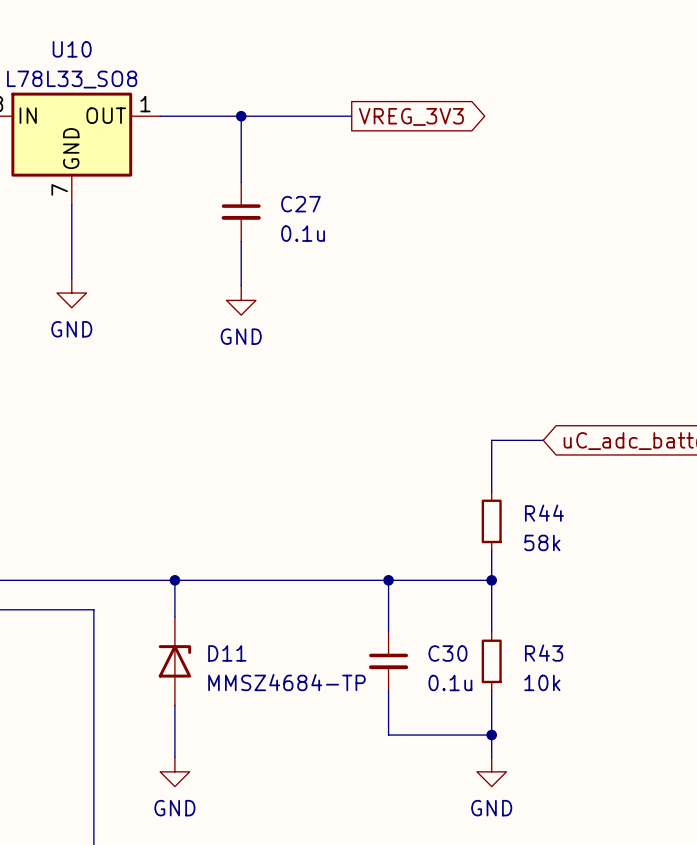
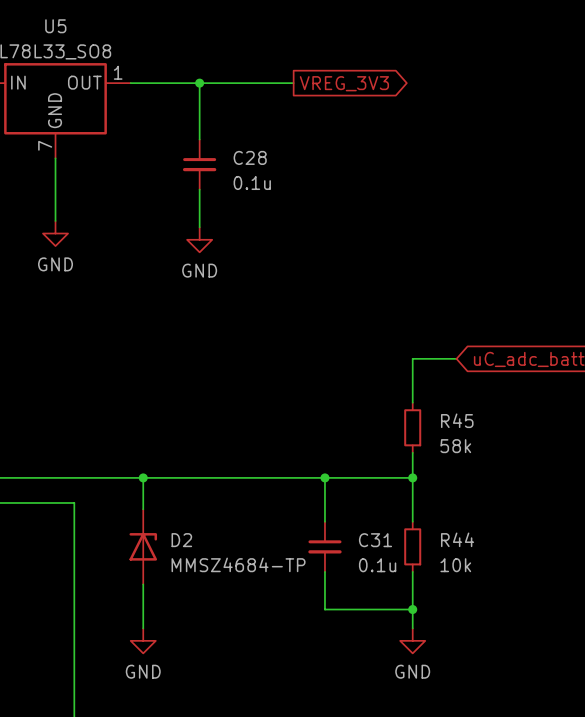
U10 name: U10 (72, 49) -> U5 (55, 26)
C27 name: C27 (300, 204) -> C28 (250, 157)
R44 name: R44 (544, 513) -> R45 (457, 420)
D11 name: D11 (227, 653) -> D2 (181, 540)
C30 name: C30 (447, 653) -> C31 (375, 540)
R43 name: R43 (544, 653) -> R44 (457, 539)

